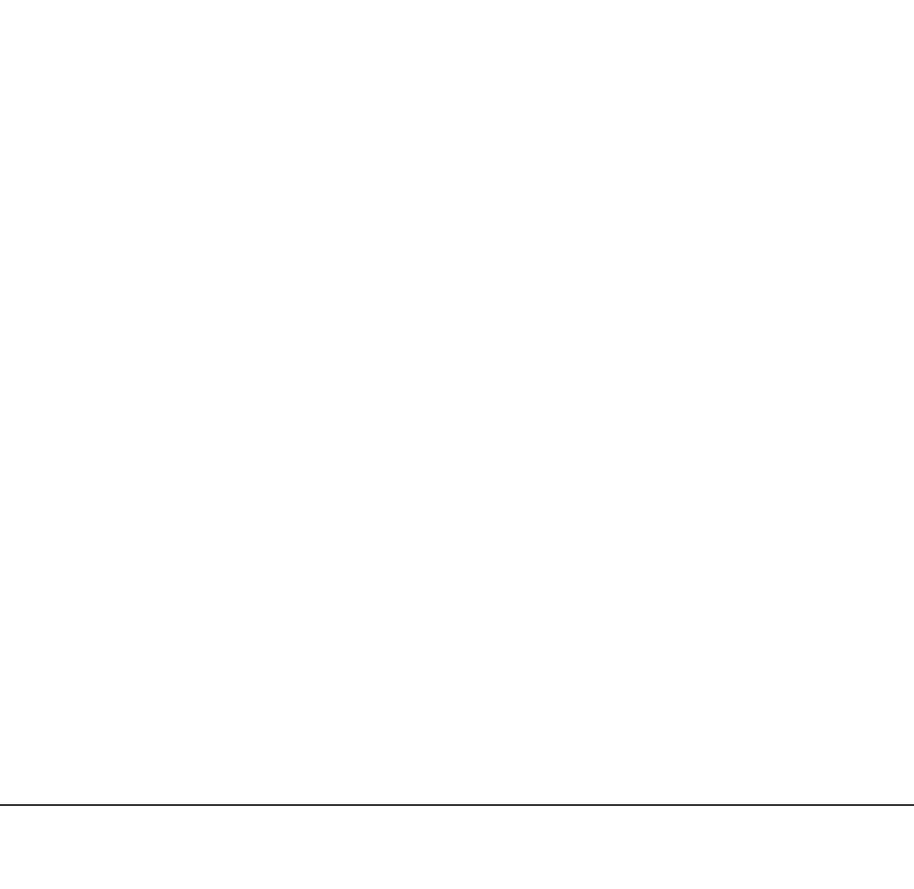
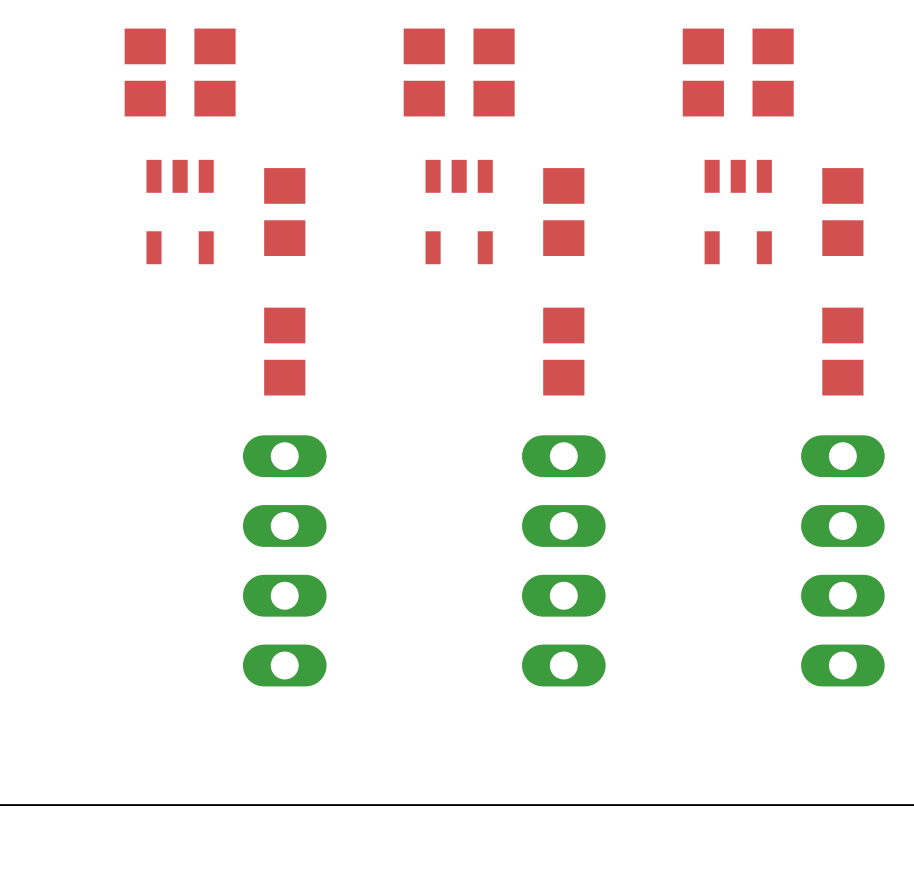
part: none -> (145, 72)
part: none -> (214, 72)
part: none -> (424, 72)
part: none -> (494, 72)
part: none -> (703, 72)
part: none -> (773, 72)
part: none -> (180, 212)
part: none -> (284, 212)
part: none -> (459, 212)
part: none -> (563, 212)
part: none -> (738, 212)
part: none -> (842, 212)
part: none -> (284, 351)
part: none -> (563, 351)
part: none -> (842, 351)
part: none -> (284, 560)
part: none -> (563, 560)
part: none -> (842, 560)

